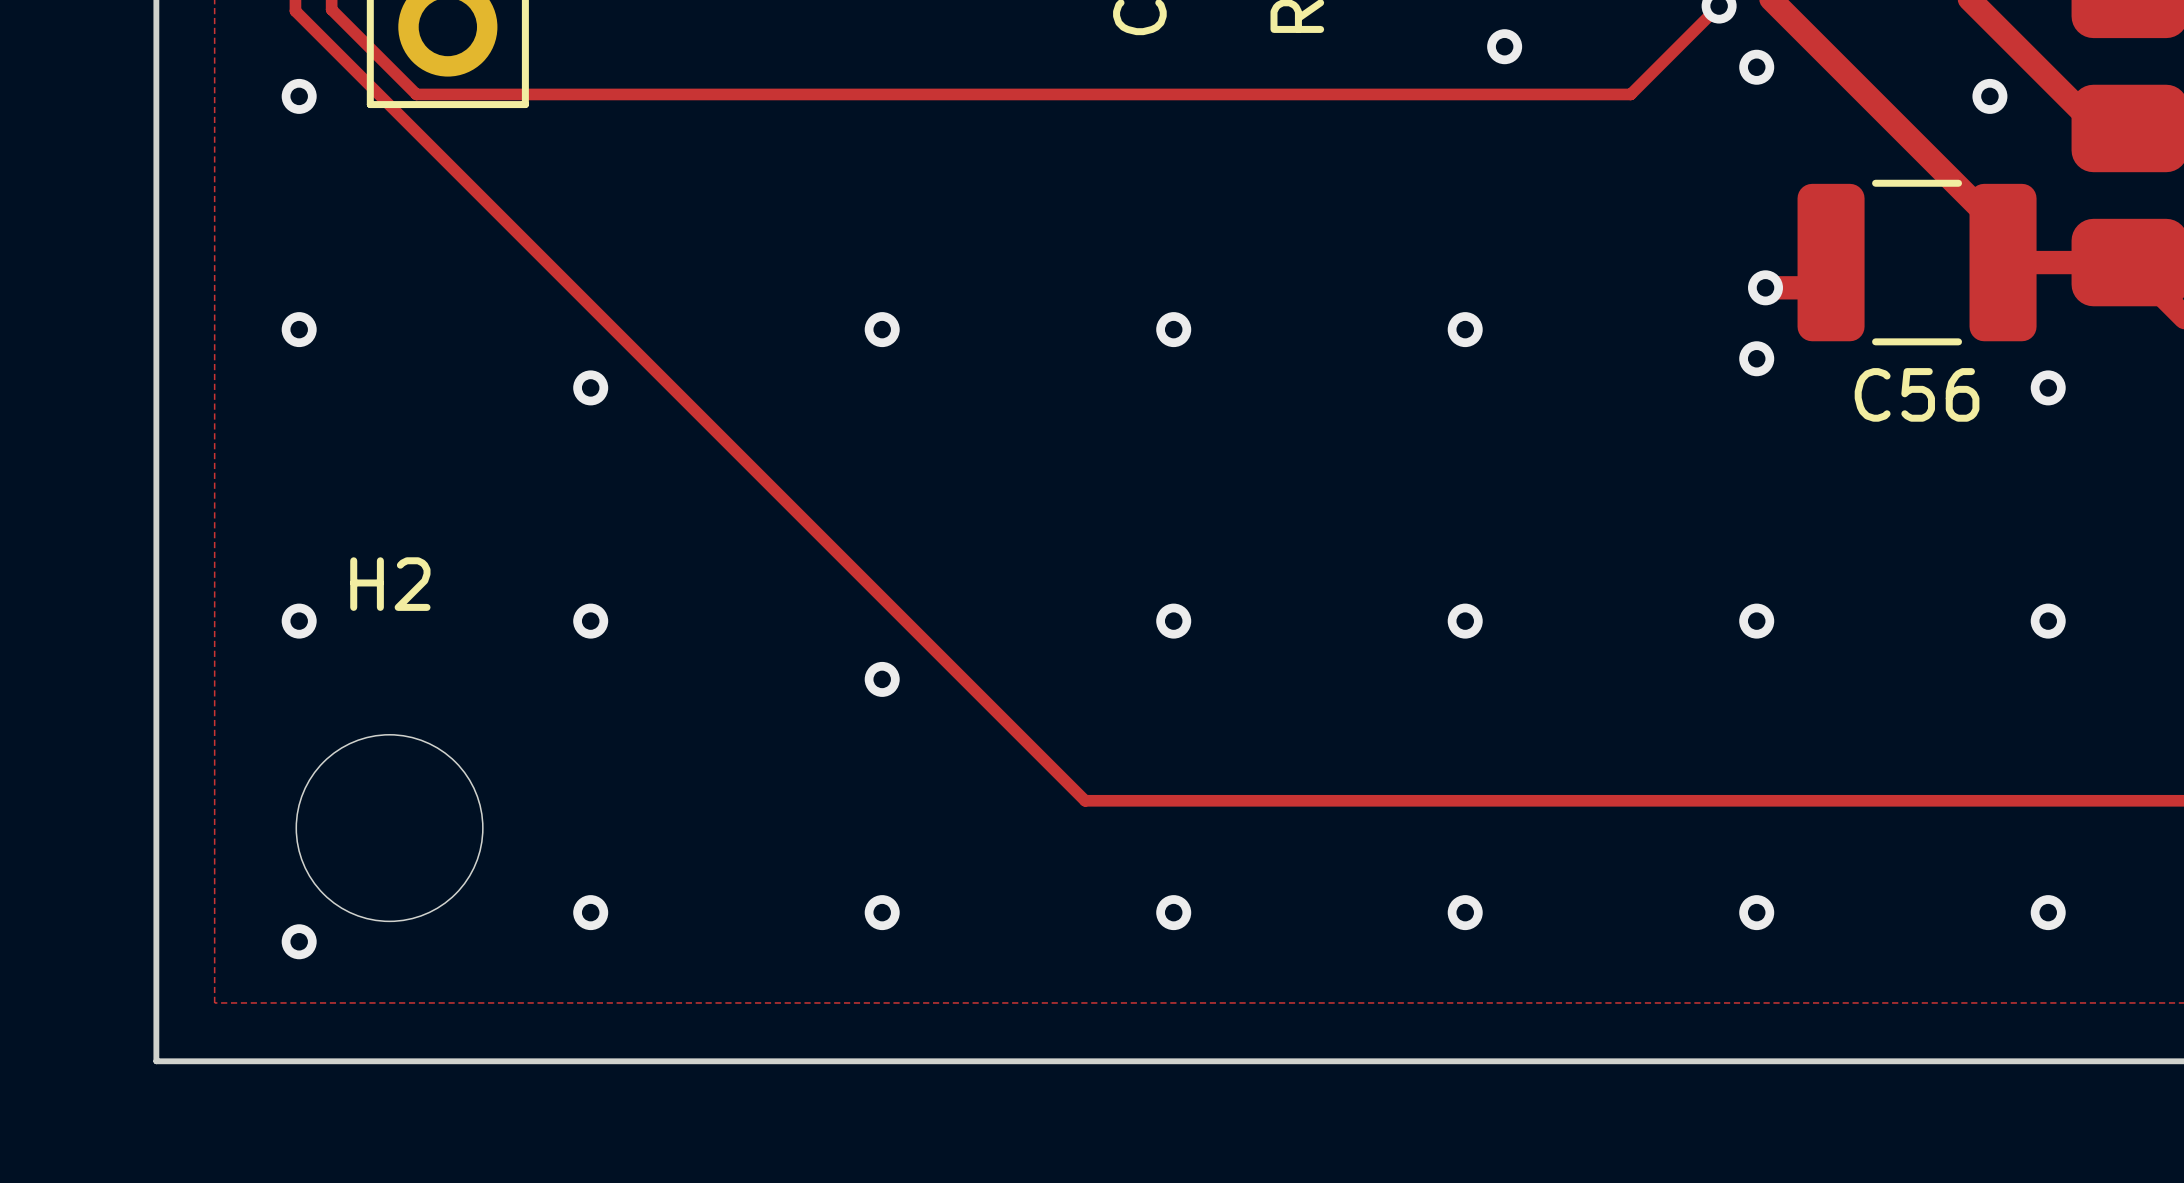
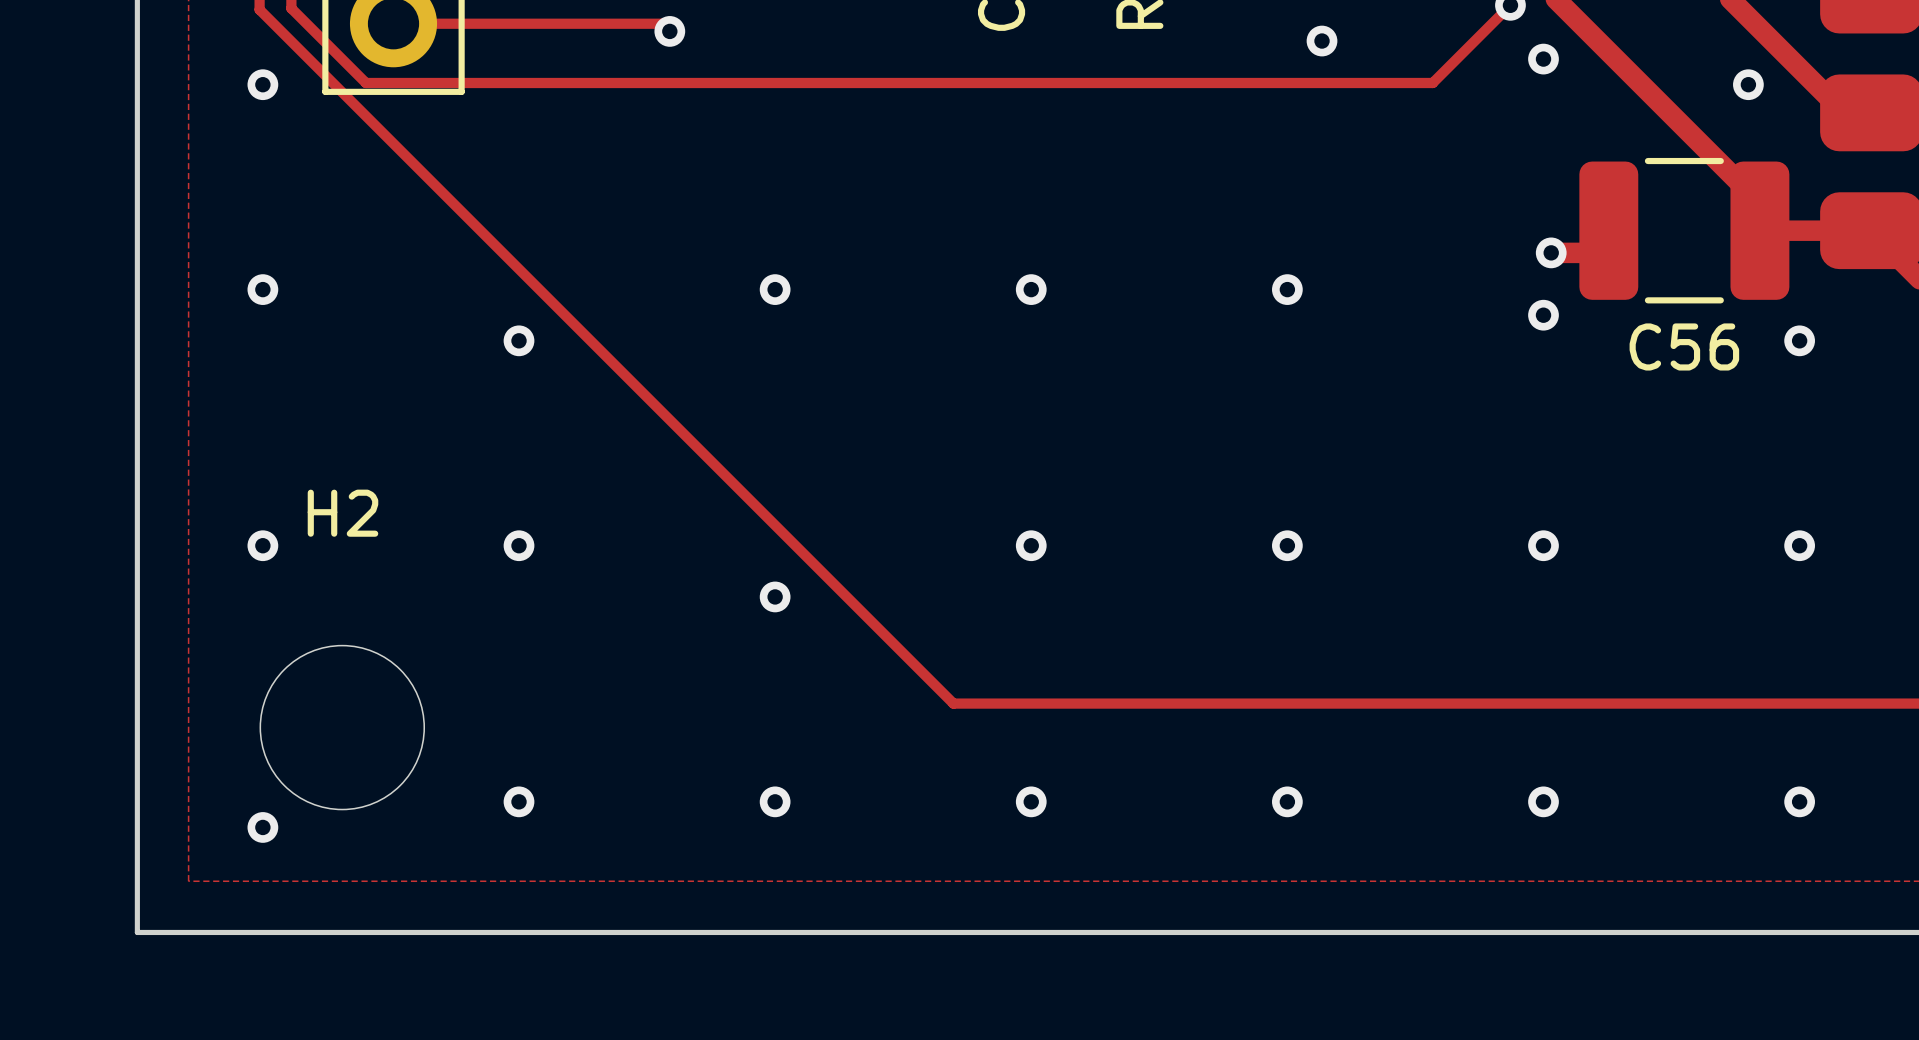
track: none -> (393, 23) (662, 23) (669, 31)
via: none -> (669, 31)

